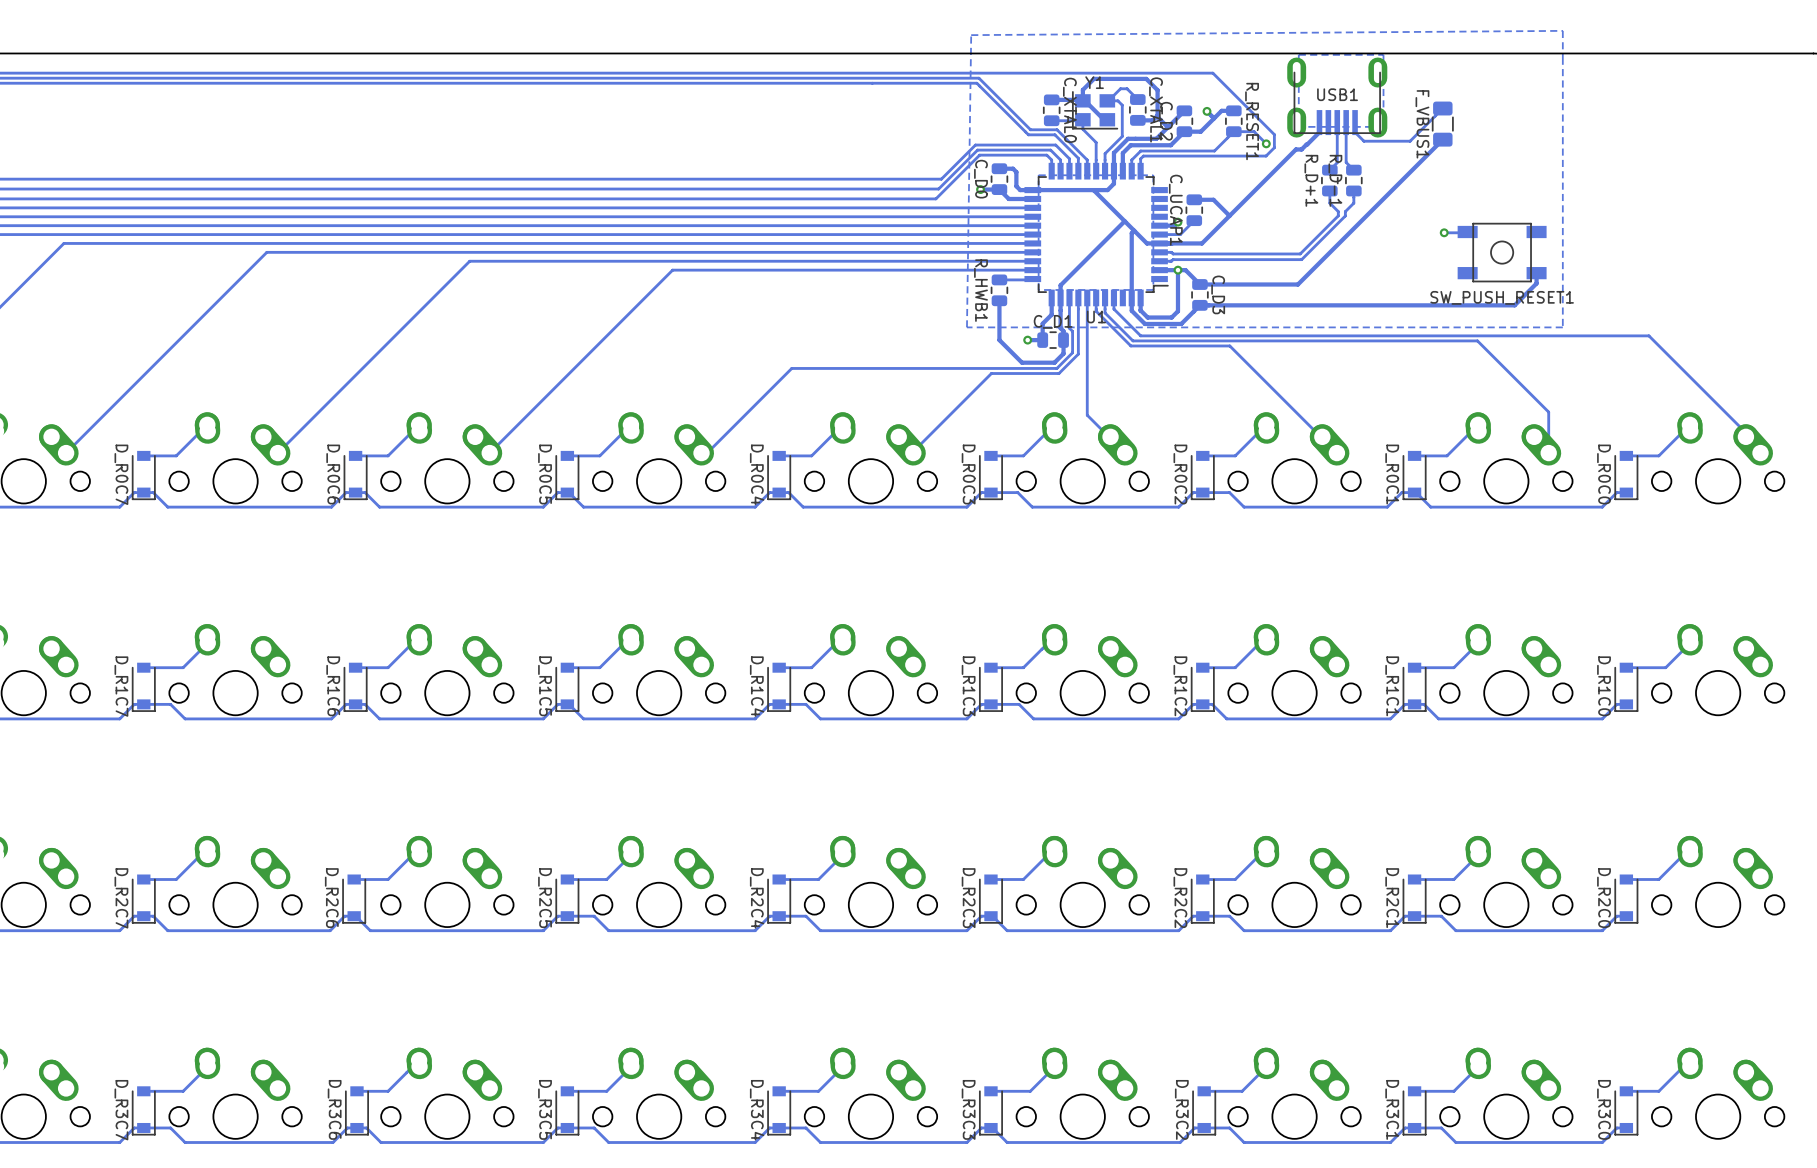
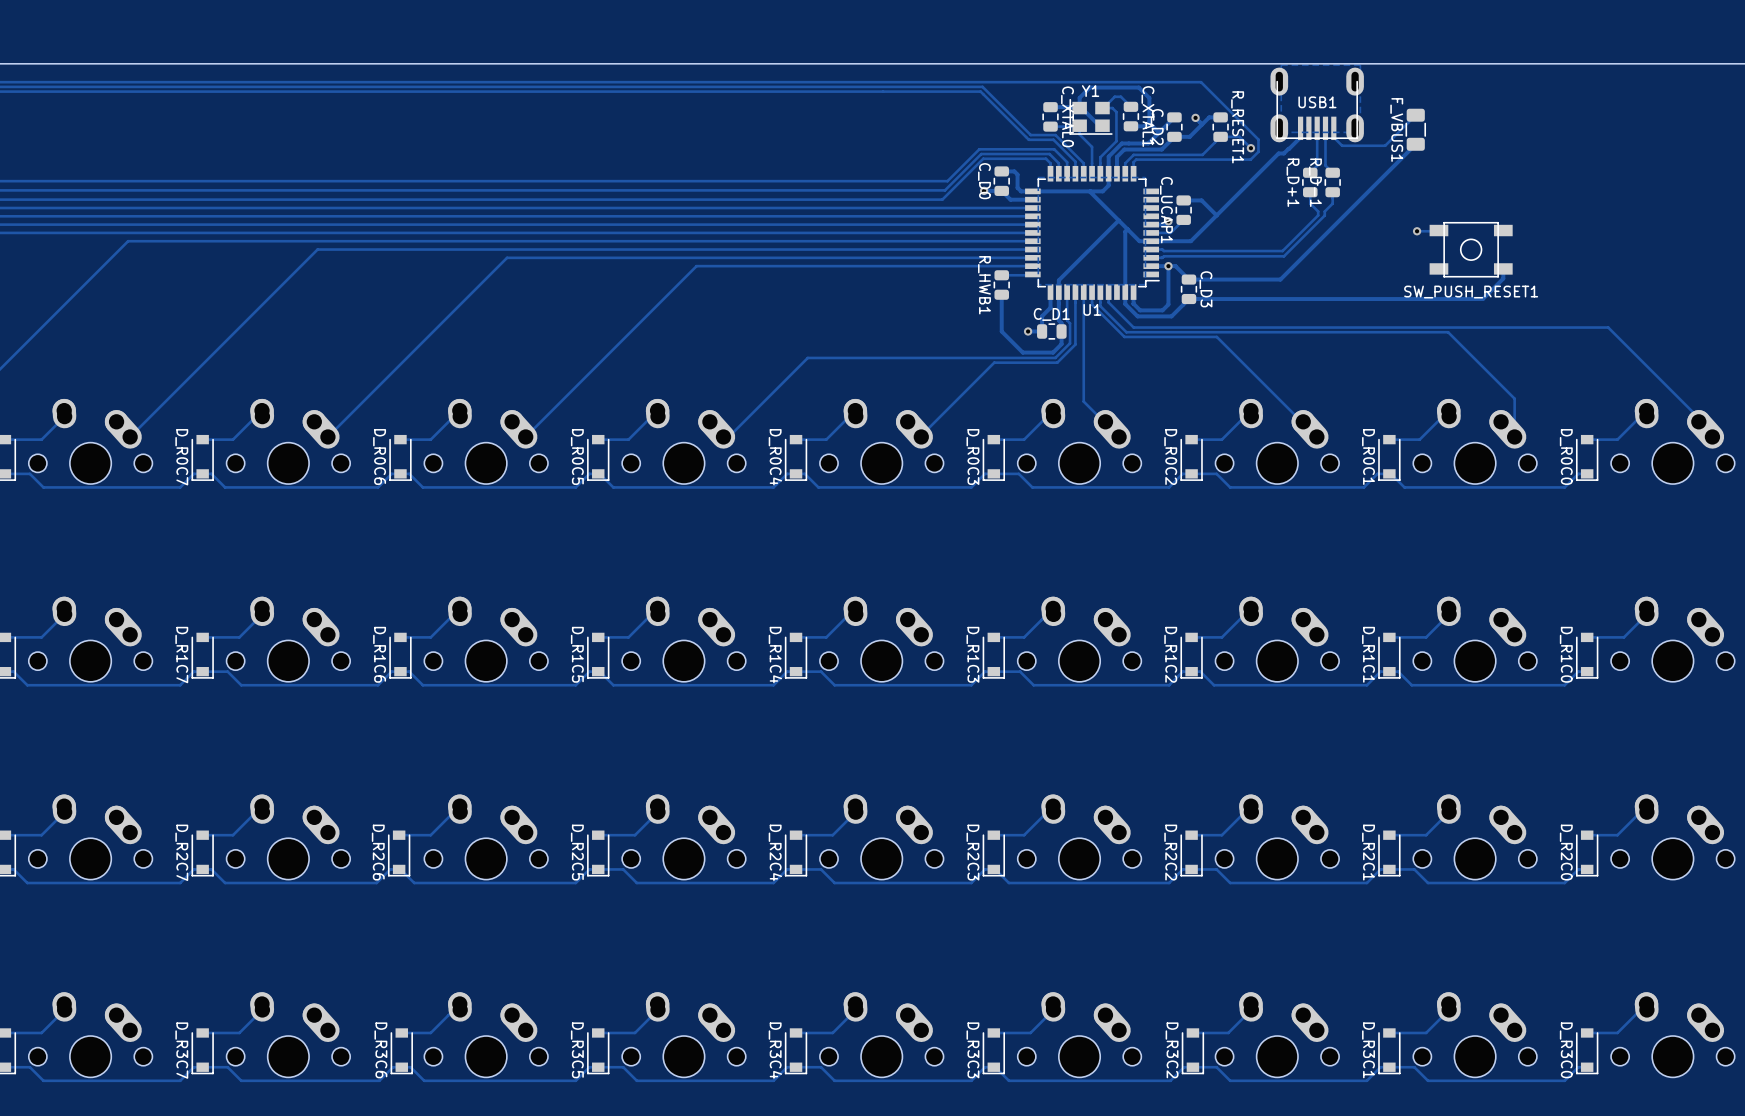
zone outline: (1562, 30) (1562, 327) (966, 327) (971, 35) (1562, 30) -> none

